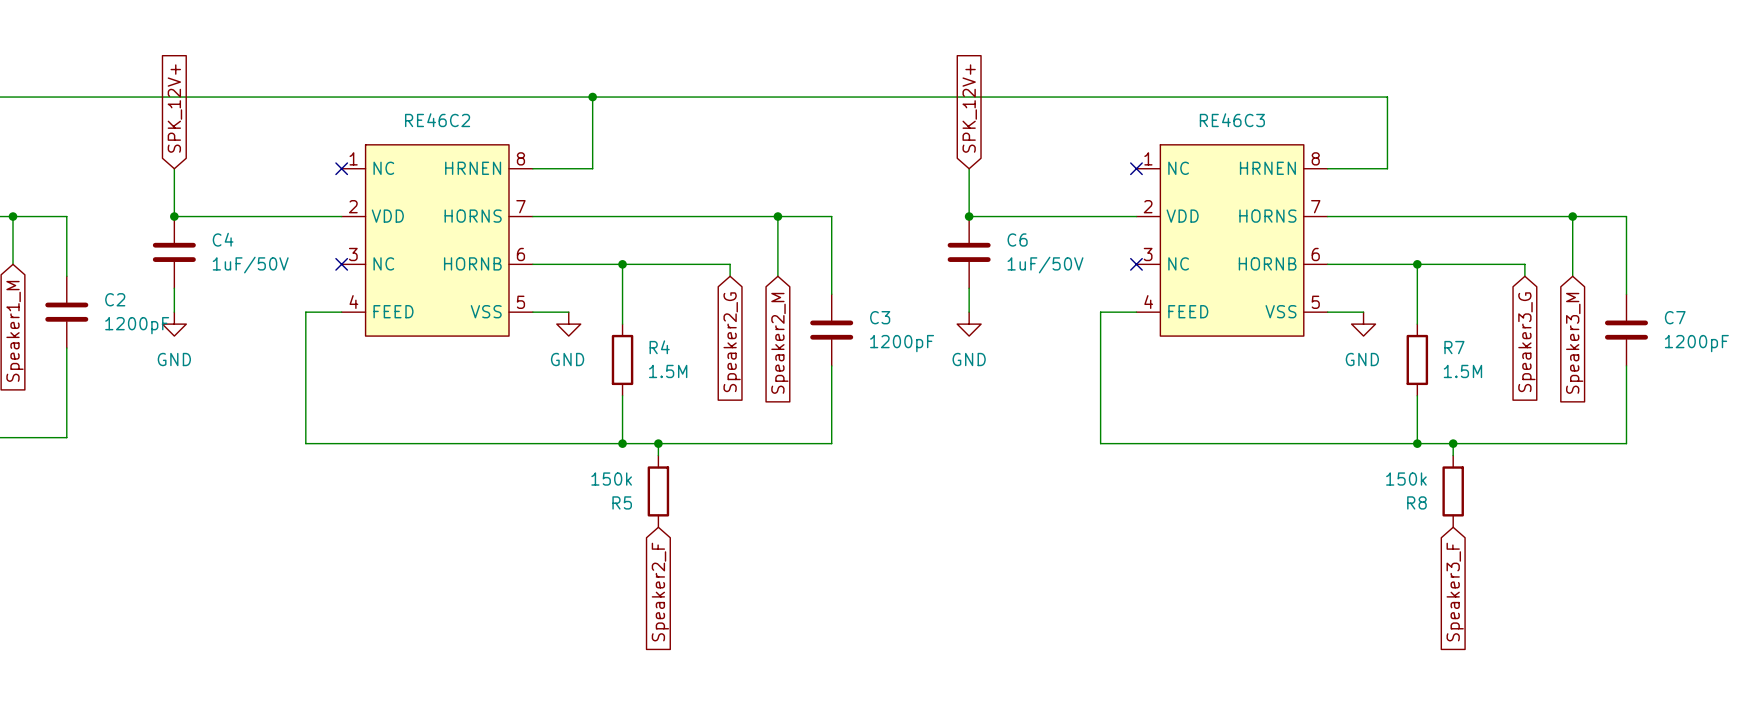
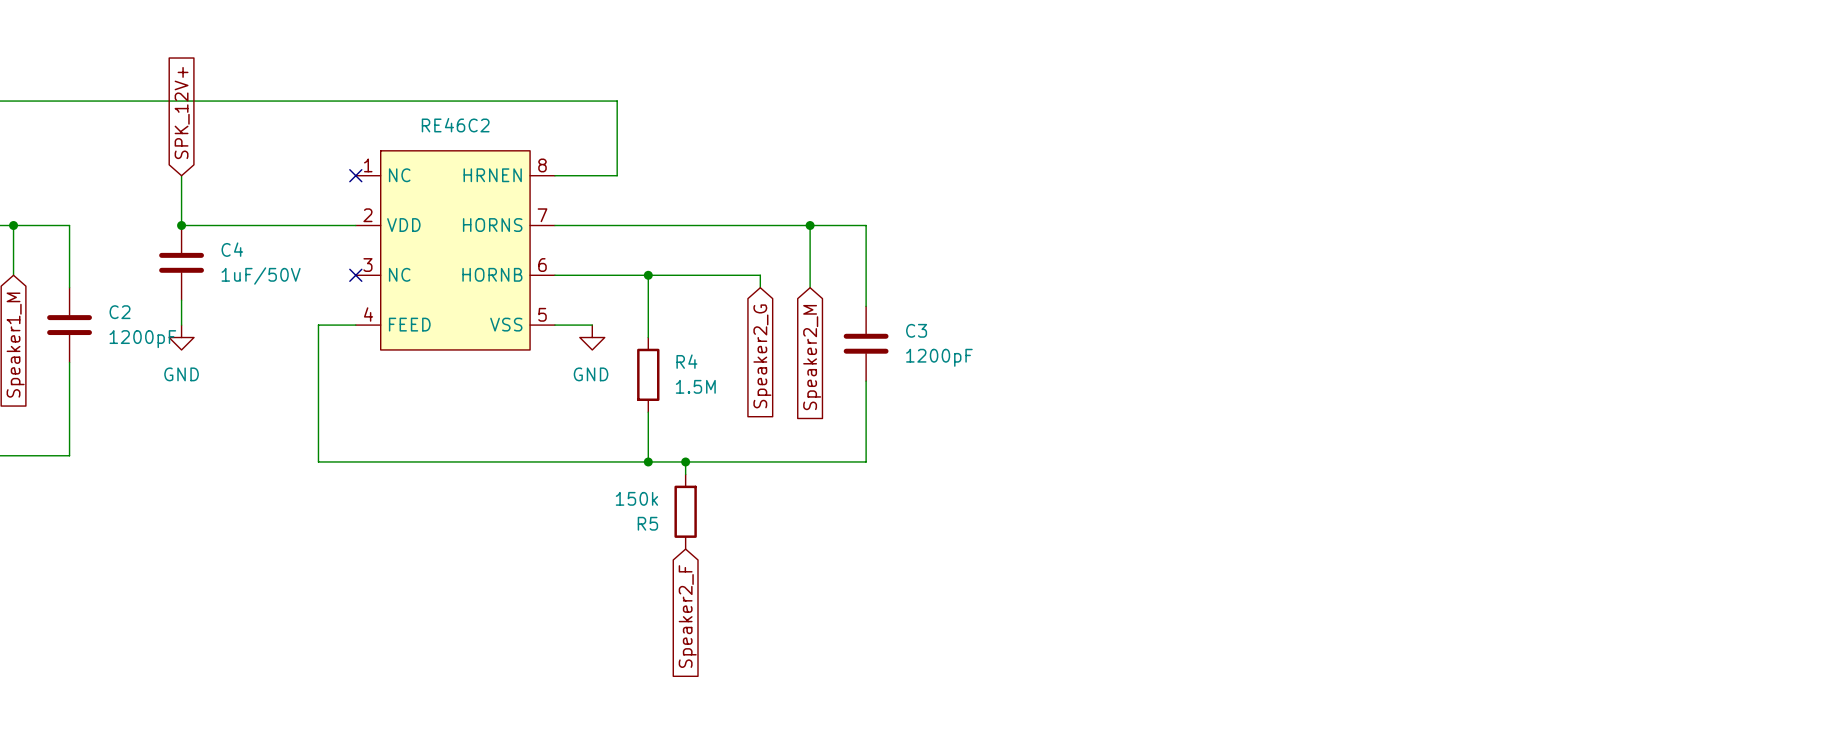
wire: (592, 97) (1387, 97) (1387, 168) (1327, 168) -> none
junction: (592, 97) -> none
global label: SPK_12V+ (969, 108) -> none
wire: (969, 168) (969, 216) (1136, 216) -> none
no-connect mark: (1136, 168) -> none
junction: (969, 216) -> none
wire: (1327, 216) (1626, 216) (1626, 294) -> none
wire: (1572, 216) (1572, 276) -> none
junction: (1572, 216) -> none
RE46C3: (1232, 240) -> none
C6: 1uF/50V (969, 252) -> none
no-connect mark: (1136, 264) -> none
wire: (1327, 264) (1524, 264) (1524, 276) -> none
wire: (1417, 264) (1417, 324) -> none
junction: (1417, 264) -> none
wire: (969, 288) (969, 312) -> none
wire: (1136, 312) (1100, 312) (1100, 443) (1626, 443) (1626, 365) -> none
wire: (1327, 312) (1363, 312) -> none
power symbol: GND (969, 324) -> none
power symbol: GND (1363, 324) -> none
C7: 1200pF (1626, 330) -> none
global label: Speaker3_G (1526, 342) -> none
global label: Speaker3_M (1574, 343) -> none
R7: 1.5M (1417, 359) -> none
wire: (1417, 395) (1417, 443) -> none
junction: (1417, 443) -> none
wire: (1453, 443) (1453, 455) -> none
junction: (1453, 443) -> none
R8: 150k (1453, 491) -> none
global label: Speaker3_F (1455, 592) -> none

